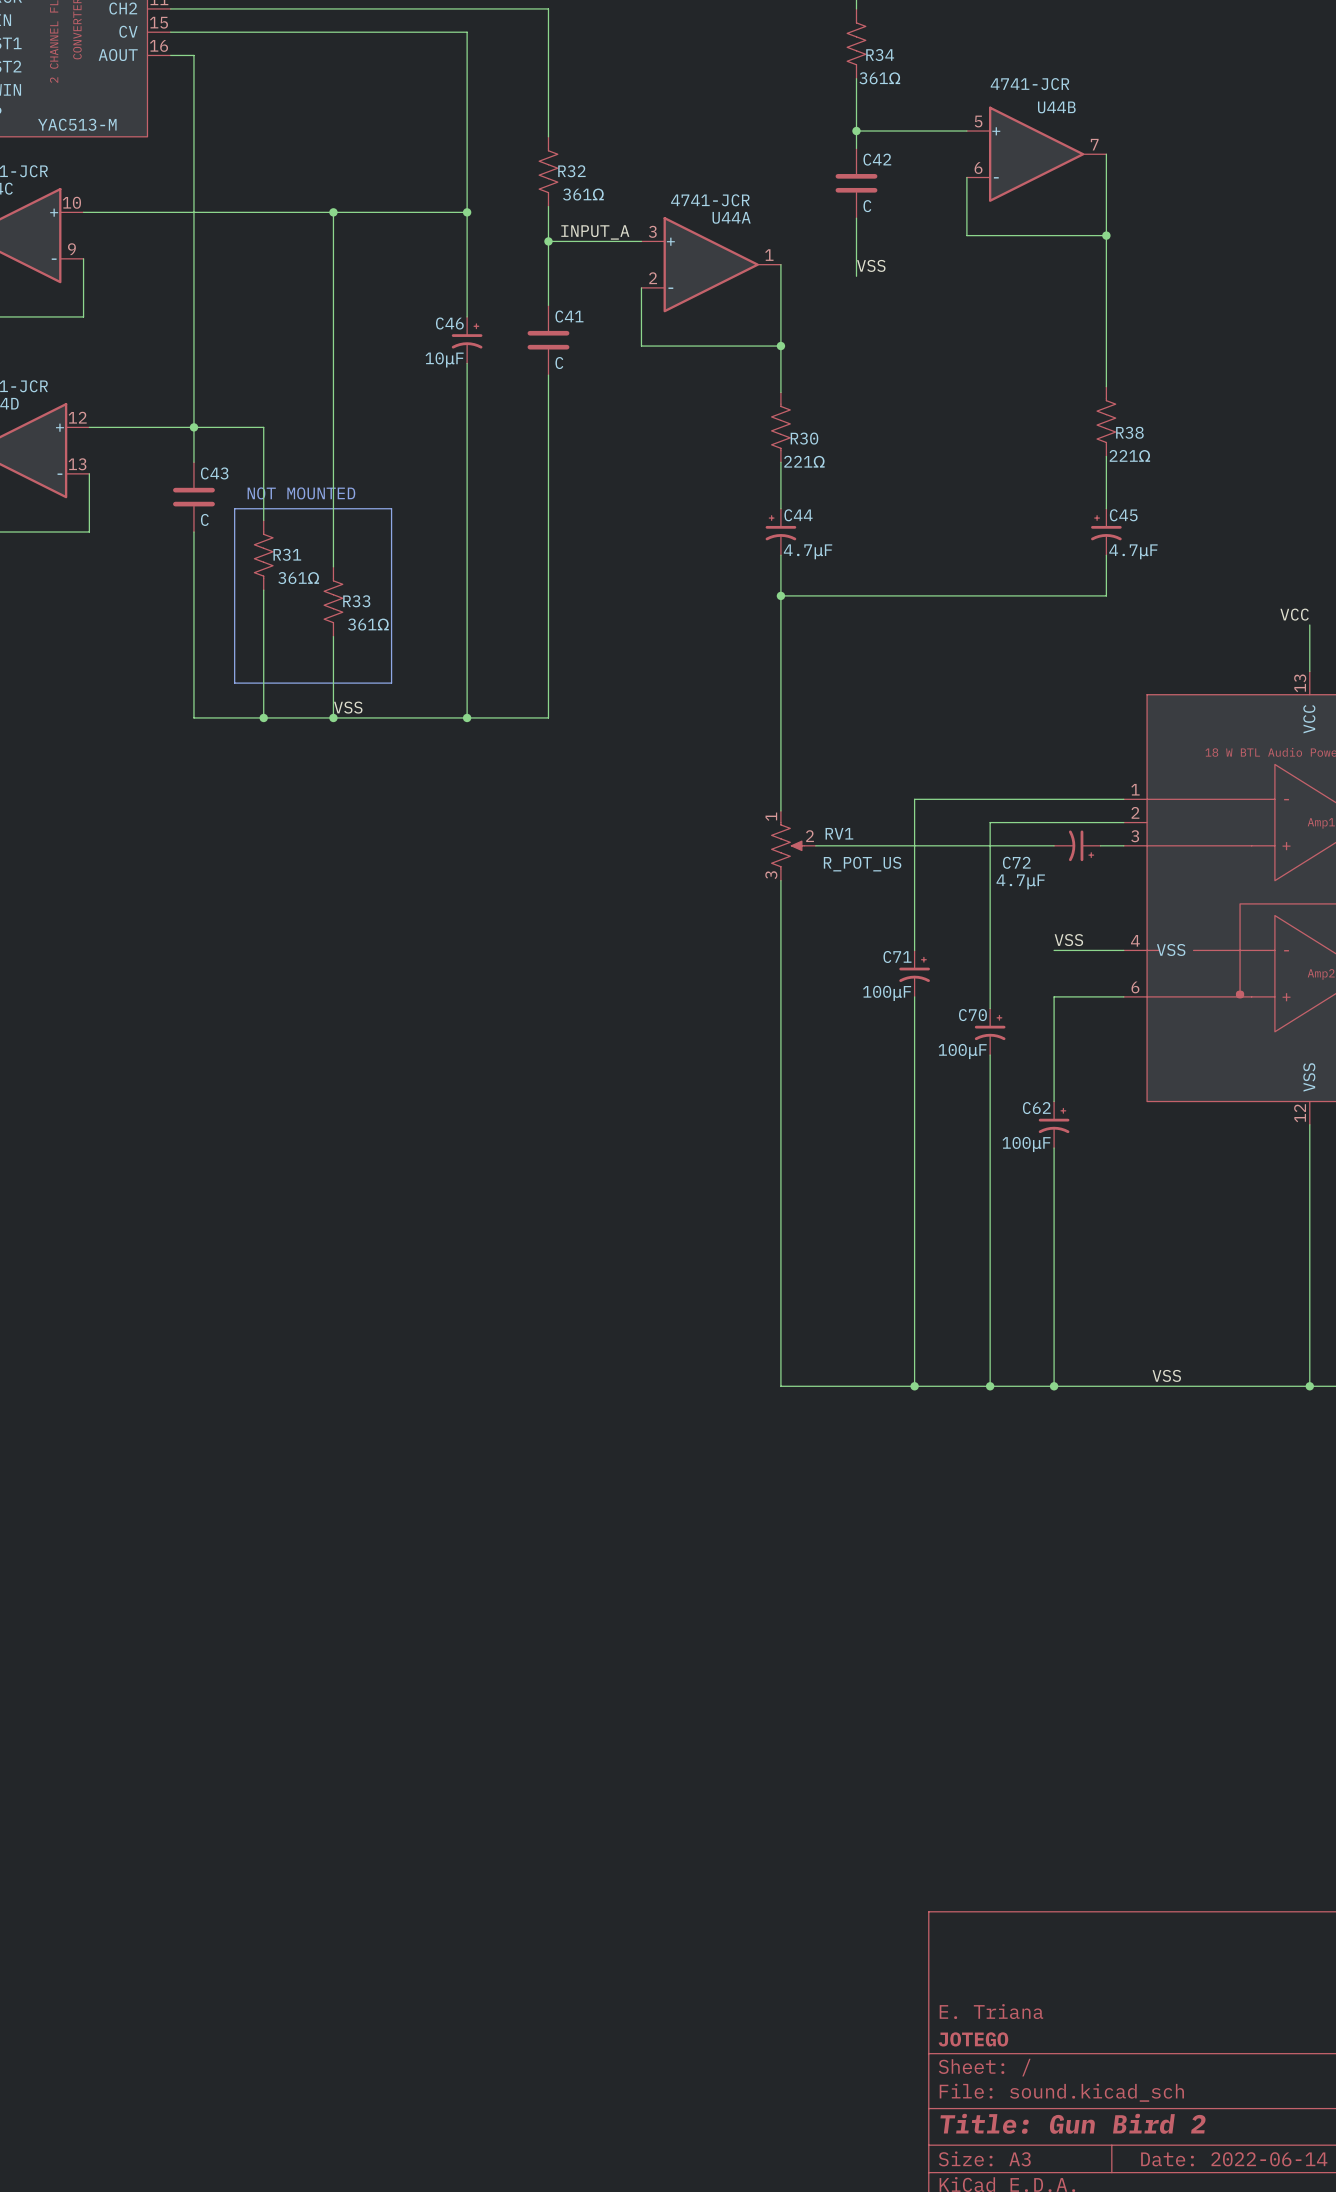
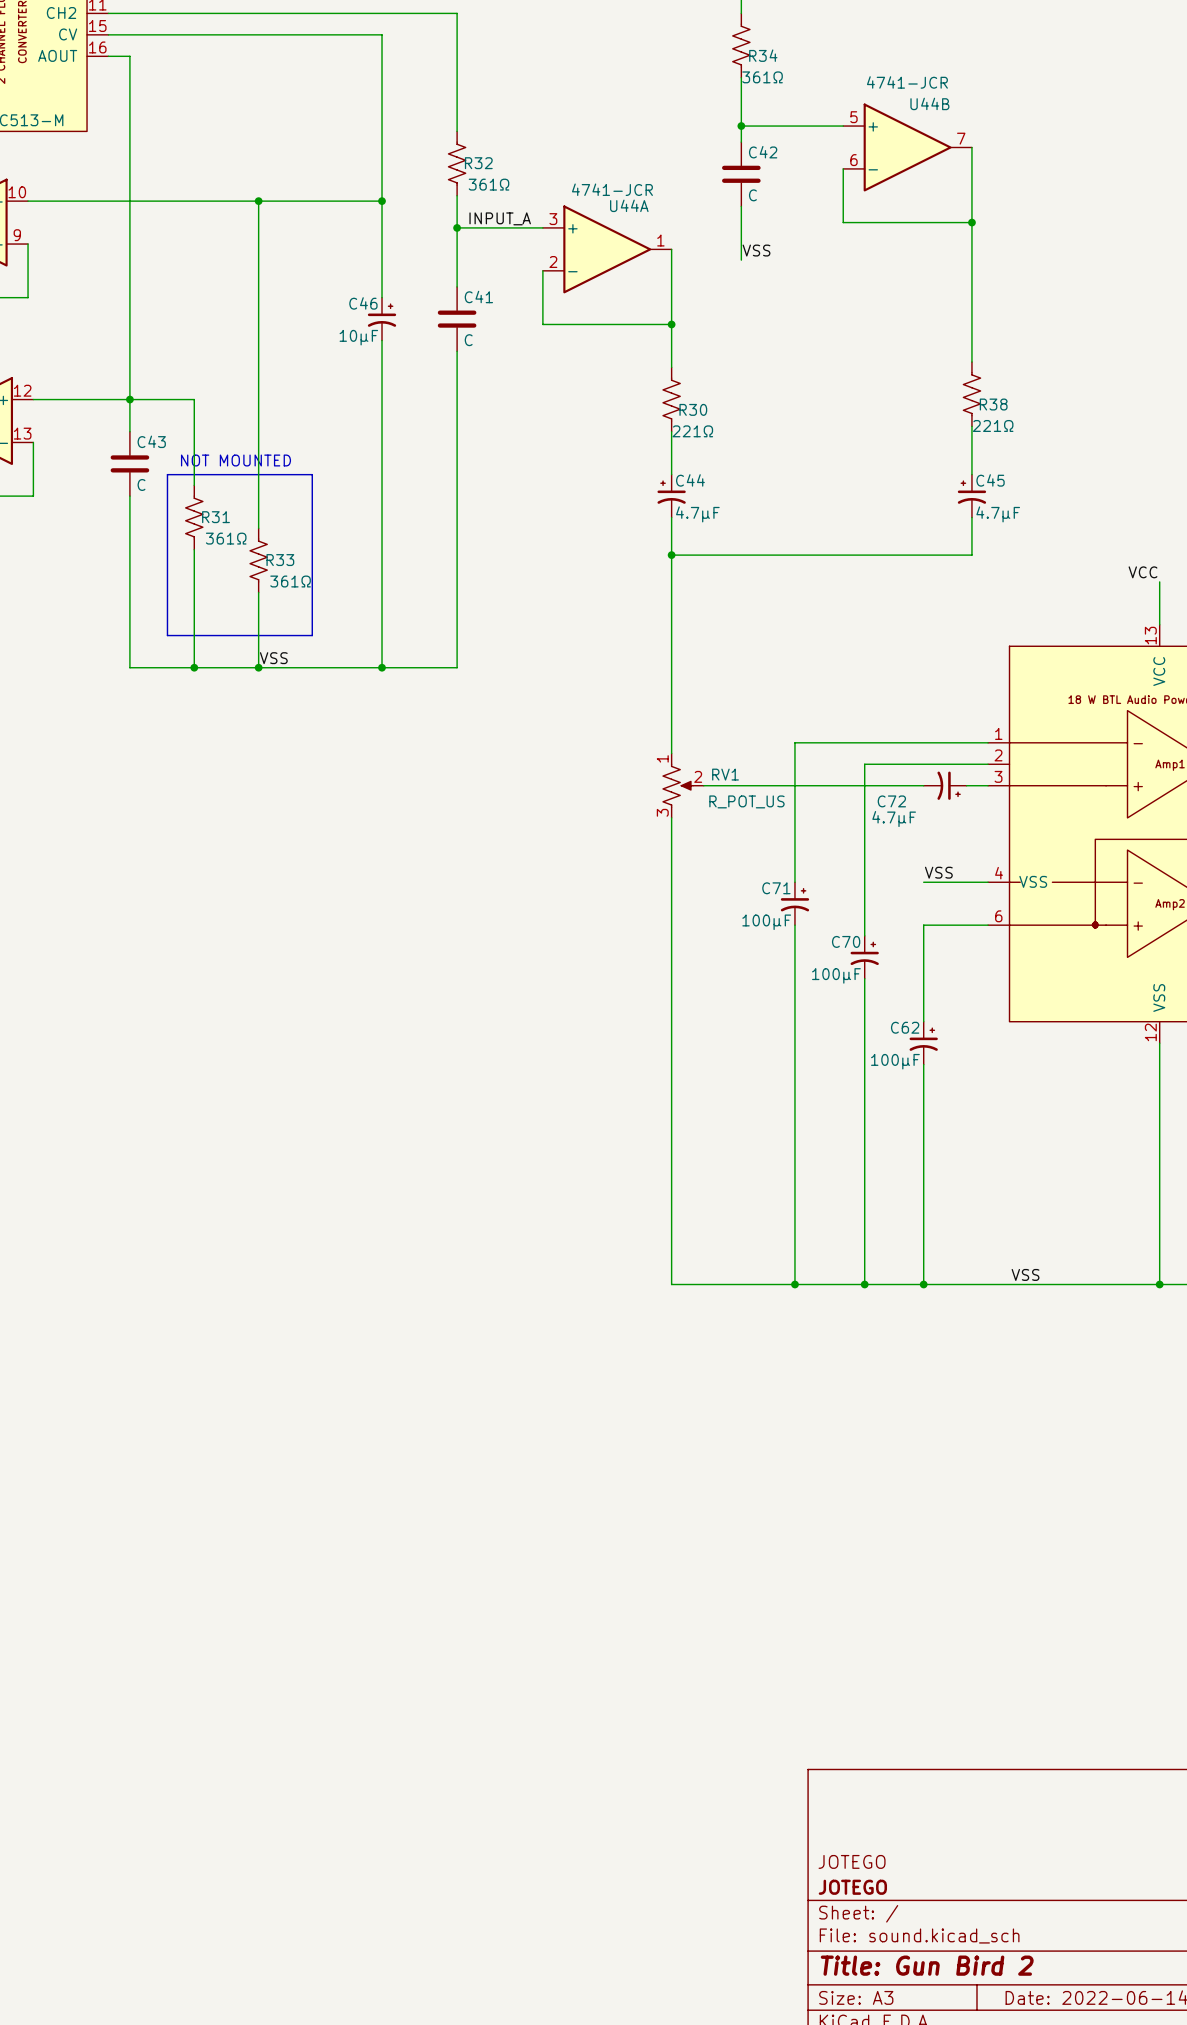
title block: E. Triana (991, 2011) -> JOTEGO (852, 1861)

